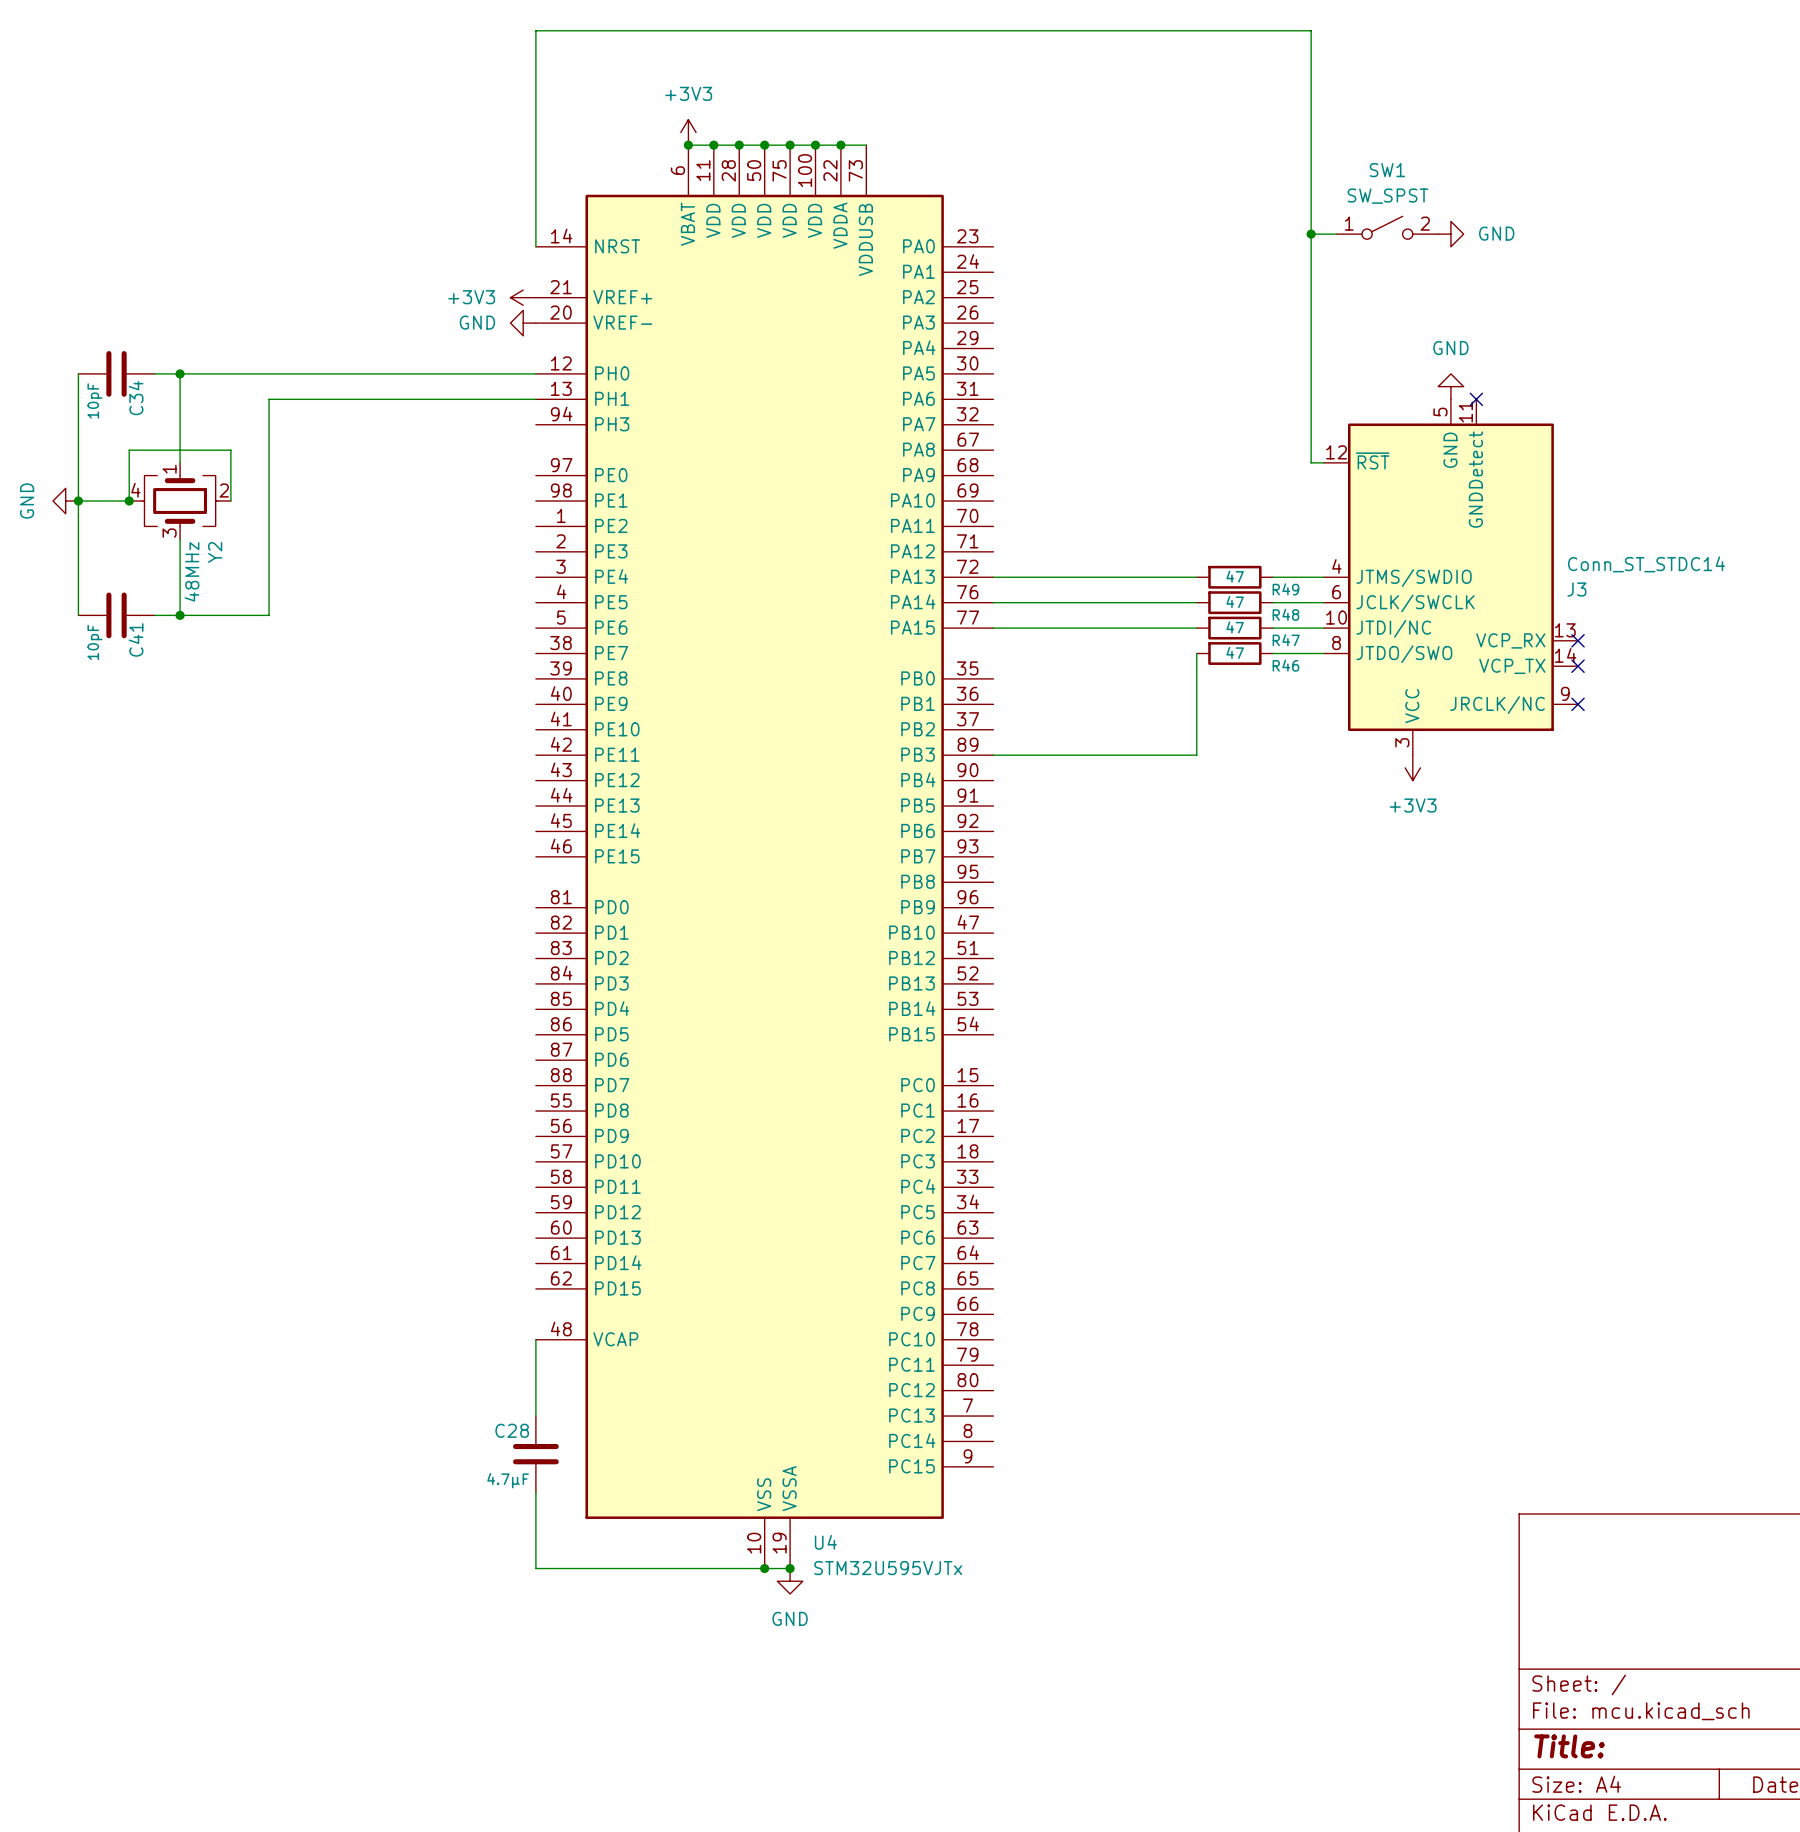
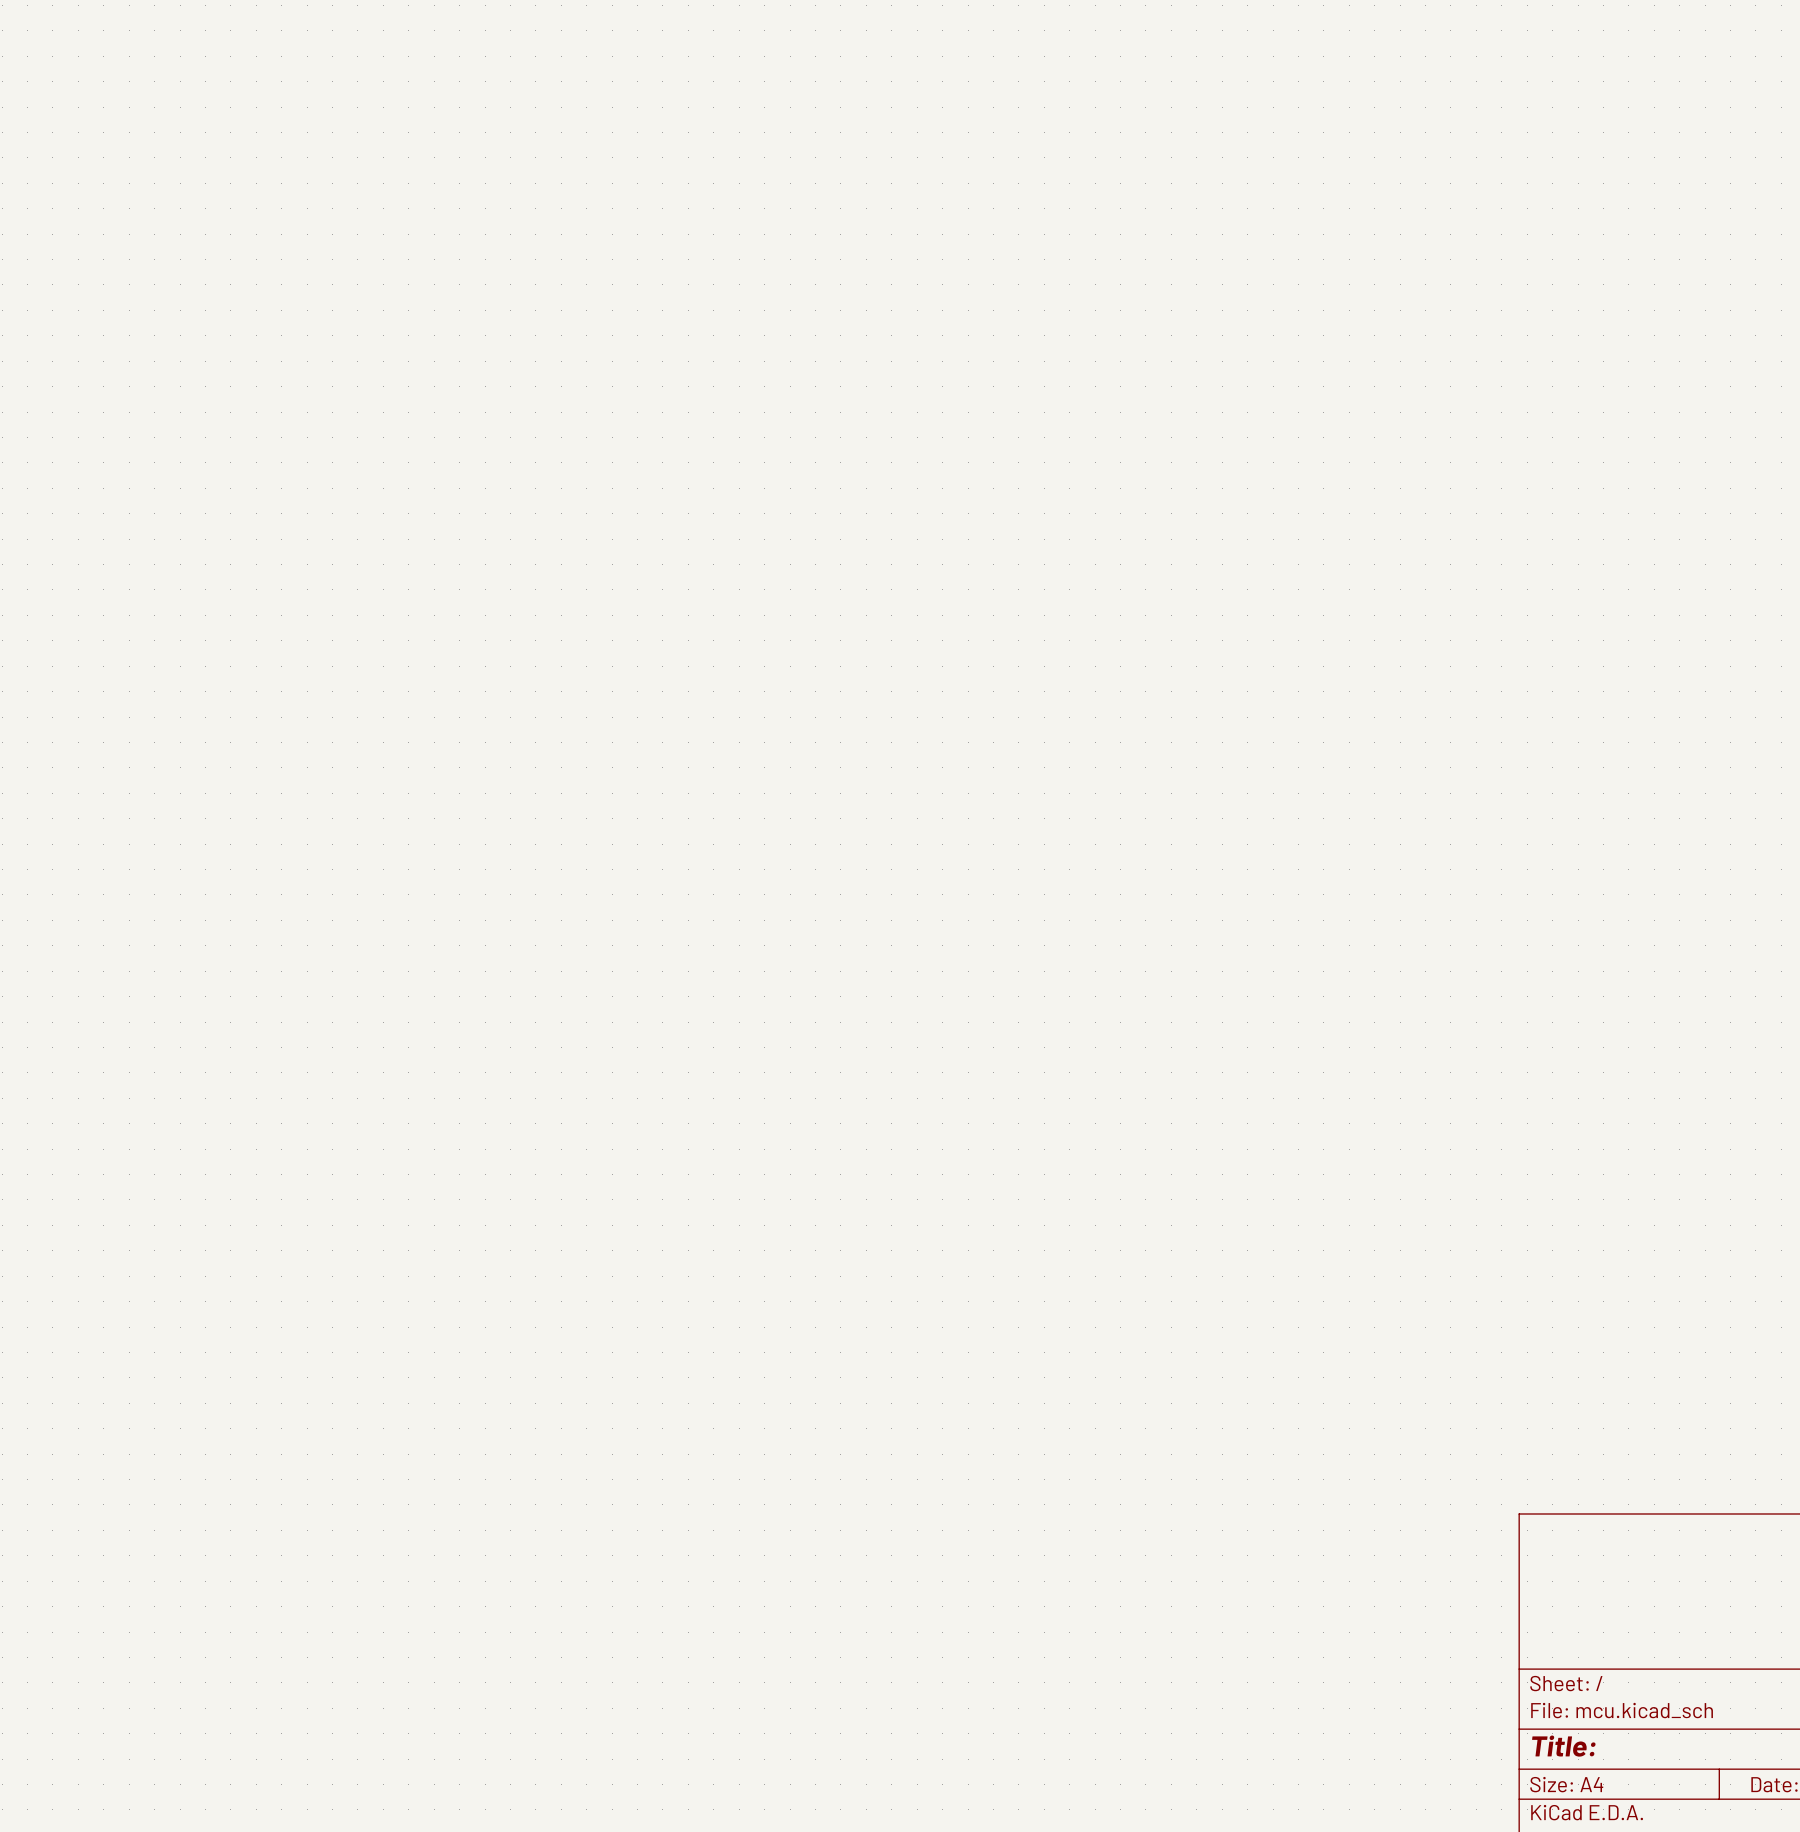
power symbol: +3V3 (688, 132) -> none
wire: (688, 145) (866, 145) -> none
junction: (688, 145) -> none
junction: (713, 145) -> none
junction: (739, 145) -> none
junction: (764, 145) -> none
junction: (790, 145) -> none
junction: (815, 145) -> none
junction: (840, 145) -> none
SW1: SW_SPST (1387, 227) -> none
wire: (1311, 234) (1336, 234) -> none
junction: (1311, 234) -> none
power symbol: GND (1450, 234) -> none
wire: (535, 246) (535, 30) (1311, 30) (1311, 462) (1323, 462) -> none
power symbol: +3V3 (523, 297) -> none
power symbol: GND (523, 323) -> none
wire: (78, 373) (78, 615) -> none
C34: 10pF (116, 373) -> none
wire: (154, 373) (535, 373) -> none
wire: (180, 373) (180, 462) -> none
junction: (180, 373) -> none
power symbol: GND (1450, 386) -> none
wire: (535, 399) (269, 399) (269, 615) (154, 615) -> none
no-connect mark: (1476, 399) -> none
power symbol: GND (65, 501) -> none
wire: (78, 501) (129, 501) (129, 450) (230, 450) (230, 501) -> none
junction: (78, 501) -> none
junction: (129, 501) -> none
Y2: 48MHz (180, 501) -> none
wire: (180, 539) (180, 615) -> none
wire: (993, 577) (1196, 577) -> none
R49: 47 (1234, 577) -> none
wire: (1273, 577) (1323, 577) -> none
J3: Conn_ST_STDC14 (1450, 577) -> none
wire: (993, 602) (1196, 602) -> none
R48: 47 (1234, 602) -> none
wire: (1273, 602) (1323, 602) -> none
C41: 10pF (116, 615) -> none
junction: (180, 615) -> none
wire: (993, 628) (1196, 628) -> none
R47: 47 (1234, 628) -> none
wire: (1273, 628) (1323, 628) -> none
no-connect mark: (1578, 640) -> none
wire: (1196, 653) (1196, 755) (993, 755) -> none
R46: 47 (1234, 653) -> none
wire: (1273, 653) (1323, 653) -> none
no-connect mark: (1578, 666) -> none
no-connect mark: (1578, 704) -> none
power symbol: +3V3 (1412, 767) -> none
U4: STM32U595VJTx (764, 856) -> none
wire: (535, 1339) (535, 1416) -> none
C28: 4.7μF (535, 1454) -> none
wire: (535, 1492) (535, 1568) (790, 1568) -> none
junction: (764, 1568) -> none
junction: (790, 1568) -> none
power symbol: GND (790, 1581) -> none

